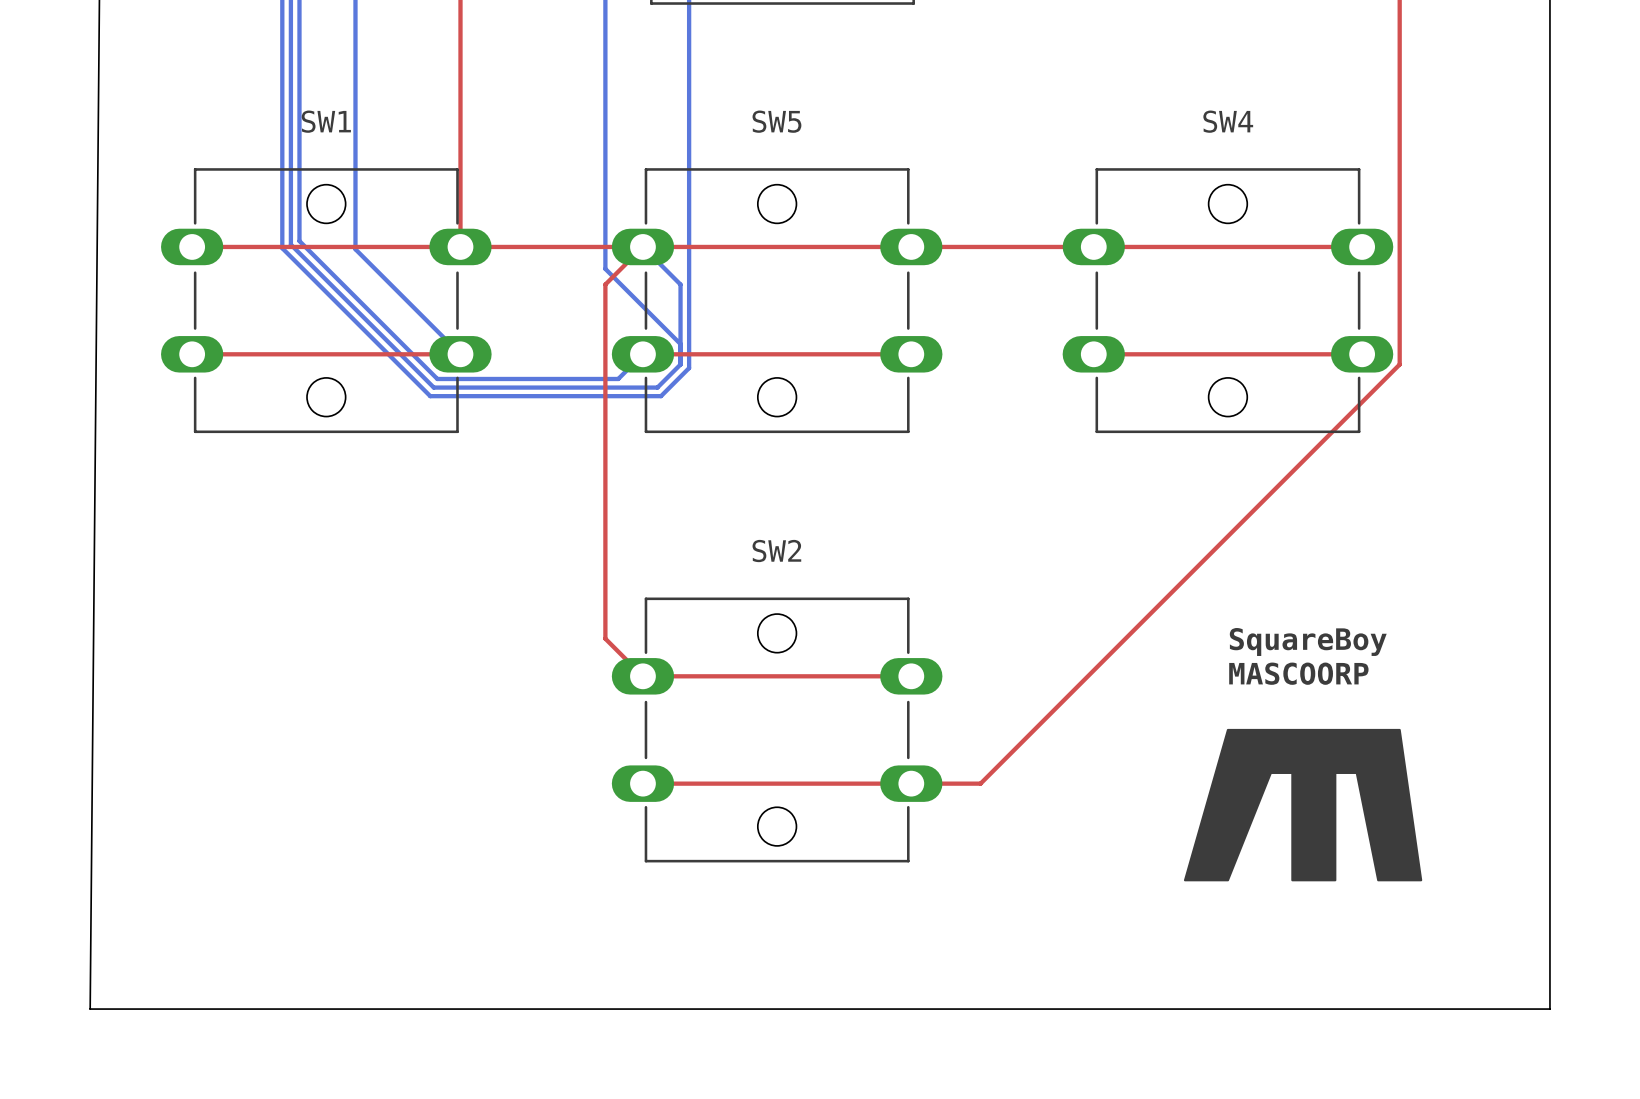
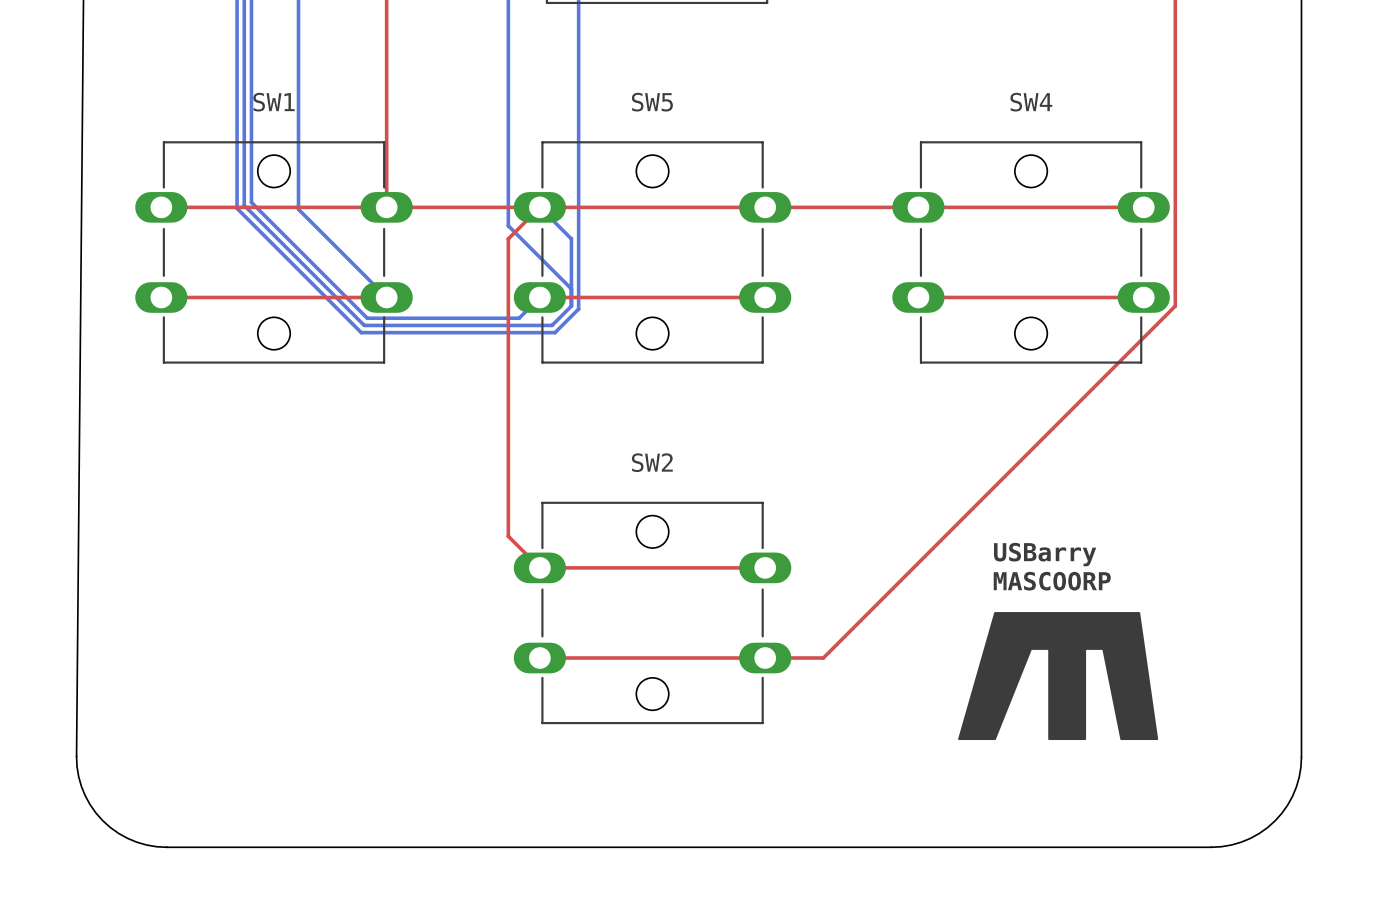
text: SquareBoy (1308, 641) -> none
text: none -> USBarry (1045, 554)
text position: MASCOORP (1298, 673) -> MASCOORP (1052, 581)
drawing position: (1303, 805) -> (1058, 676)
board edge: (91, 900) (90, 1009) (198, 1009) -> (76, 756) (81, 786) (90, 804) (102, 820) (127, 838) (146, 845) (166, 847)
board edge: (1549, 901) (1549, 1009) (1442, 1009) -> (1301, 757) (1299, 777) (1292, 796) (1275, 820) (1259, 833) (1241, 842) (1211, 847)

